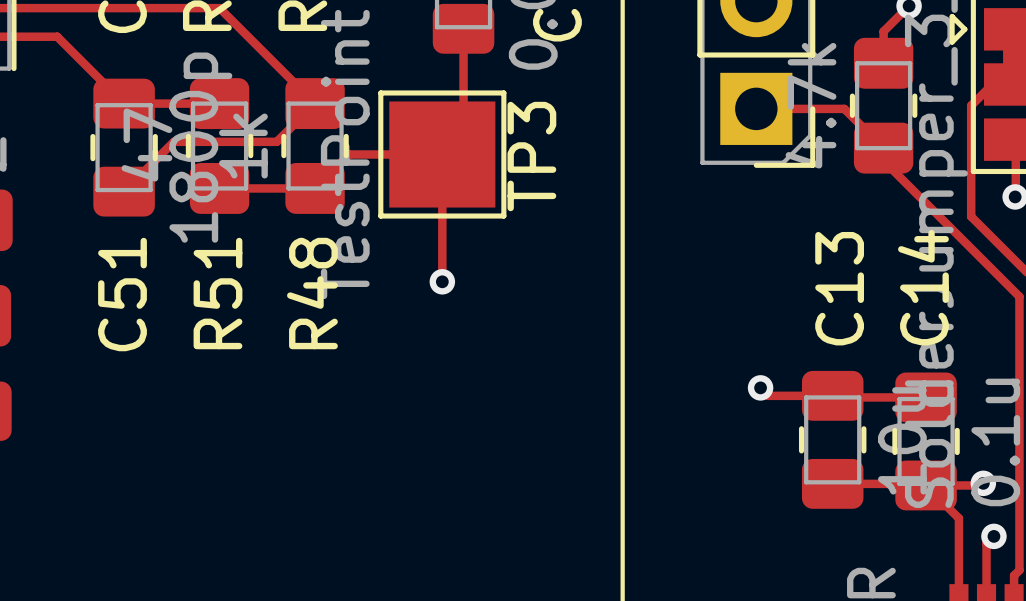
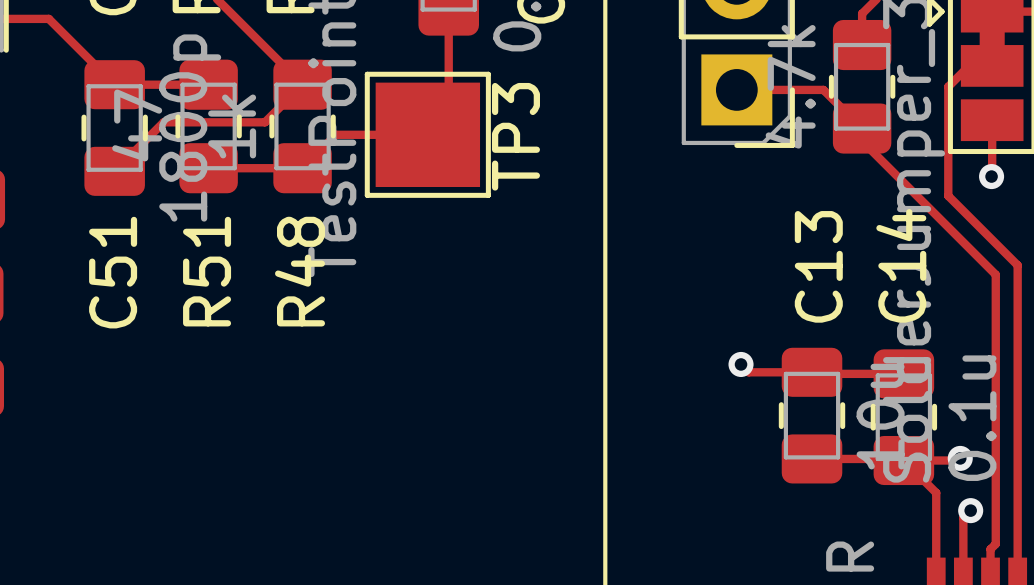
track: (442, 154) (442, 281) -> none
via: (442, 281) -> none

